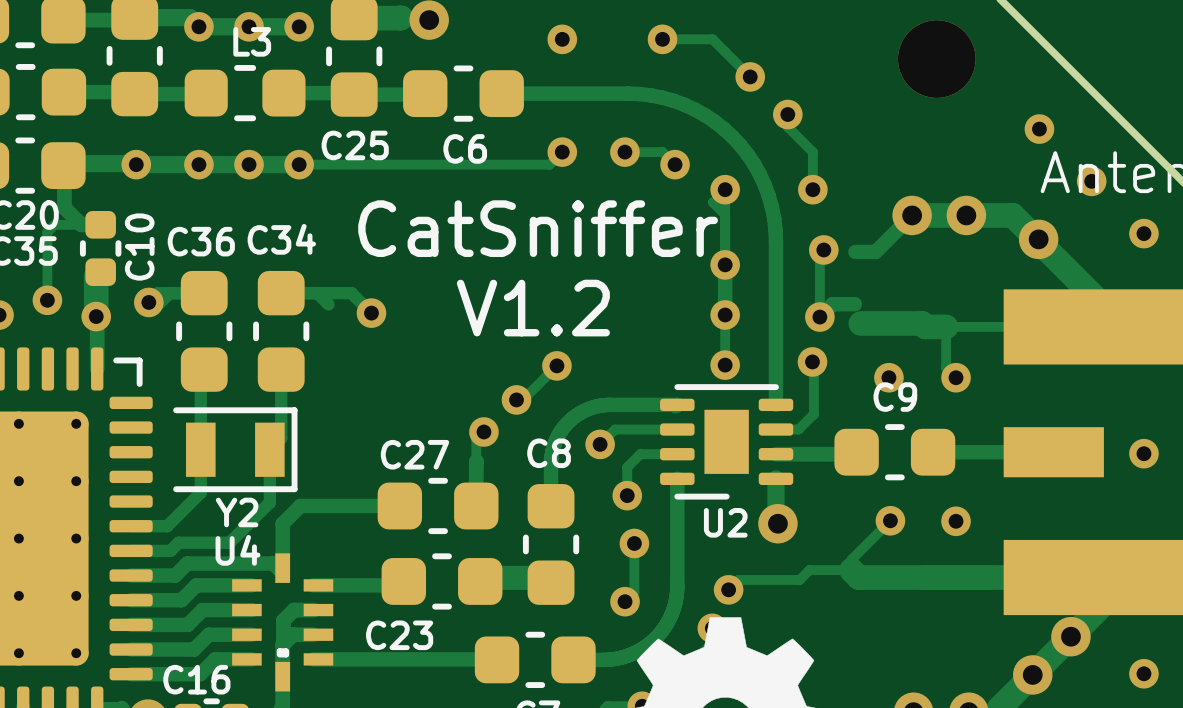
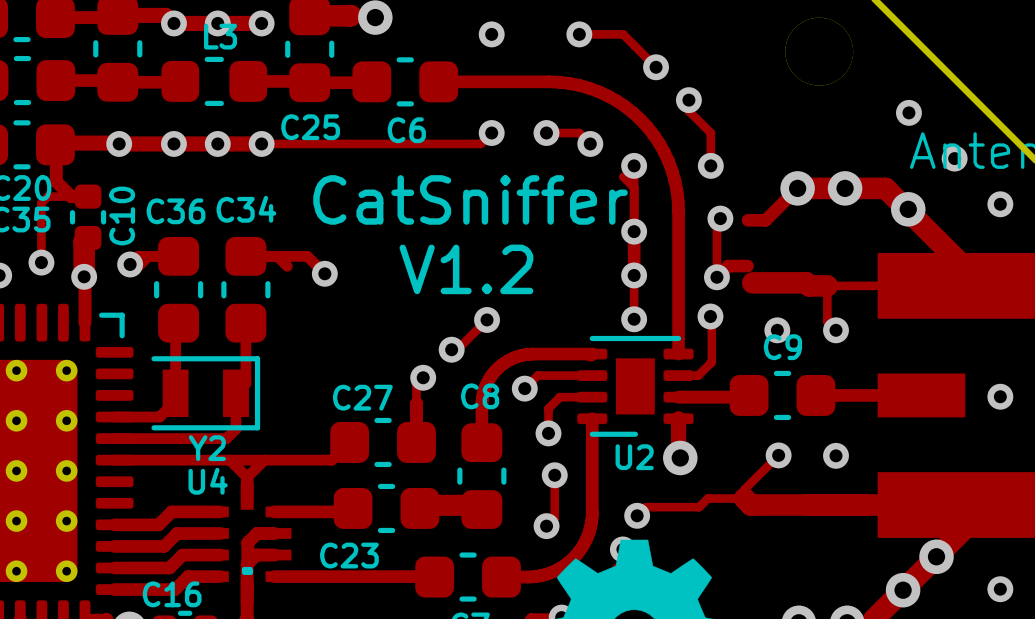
track: (200, 458) (200, 492) (167, 526) -> (175, 401) (159, 417) (114, 417)
track: (269, 490) (269, 502) (229, 542) (178, 542) (170, 550) (131, 550) -> (235, 429) (226, 438) (114, 438)
track: (399, 505) (300, 505) (282, 523) (282, 545) -> (349, 442) (331, 460) (146, 460)
track: none -> (229, 460) (247, 477) (264, 460)
track: (282, 573) (273, 563) (187, 563) (175, 575) (131, 575) -> none

